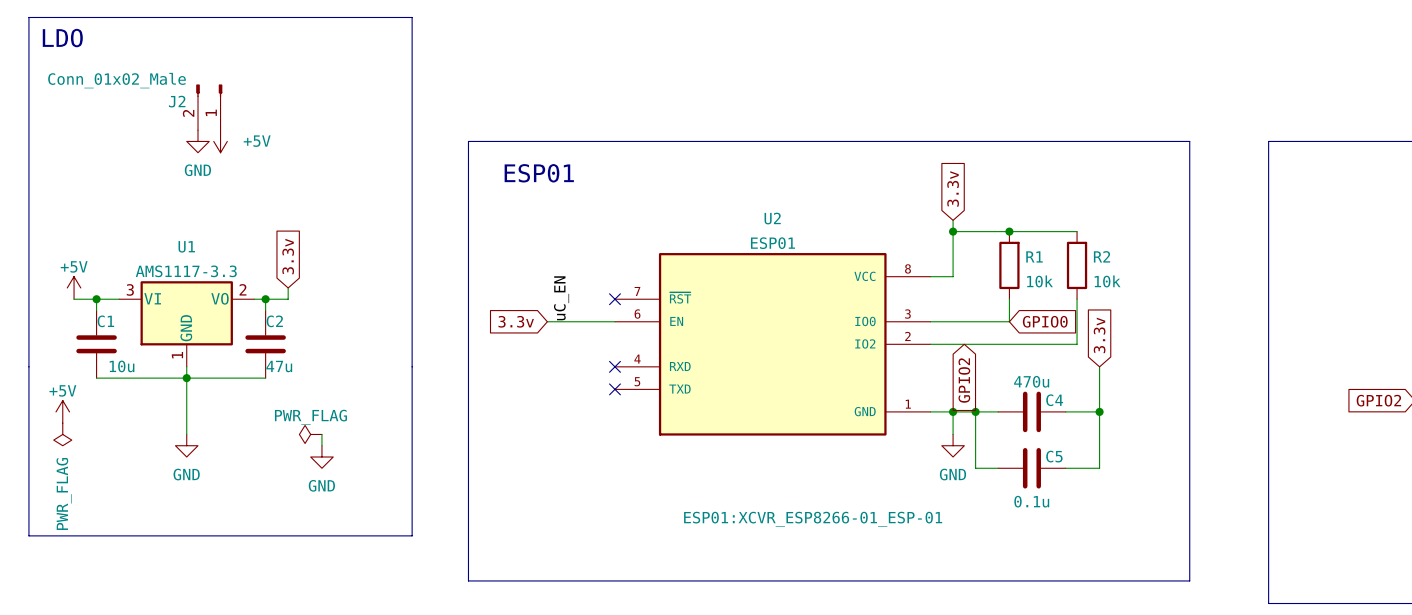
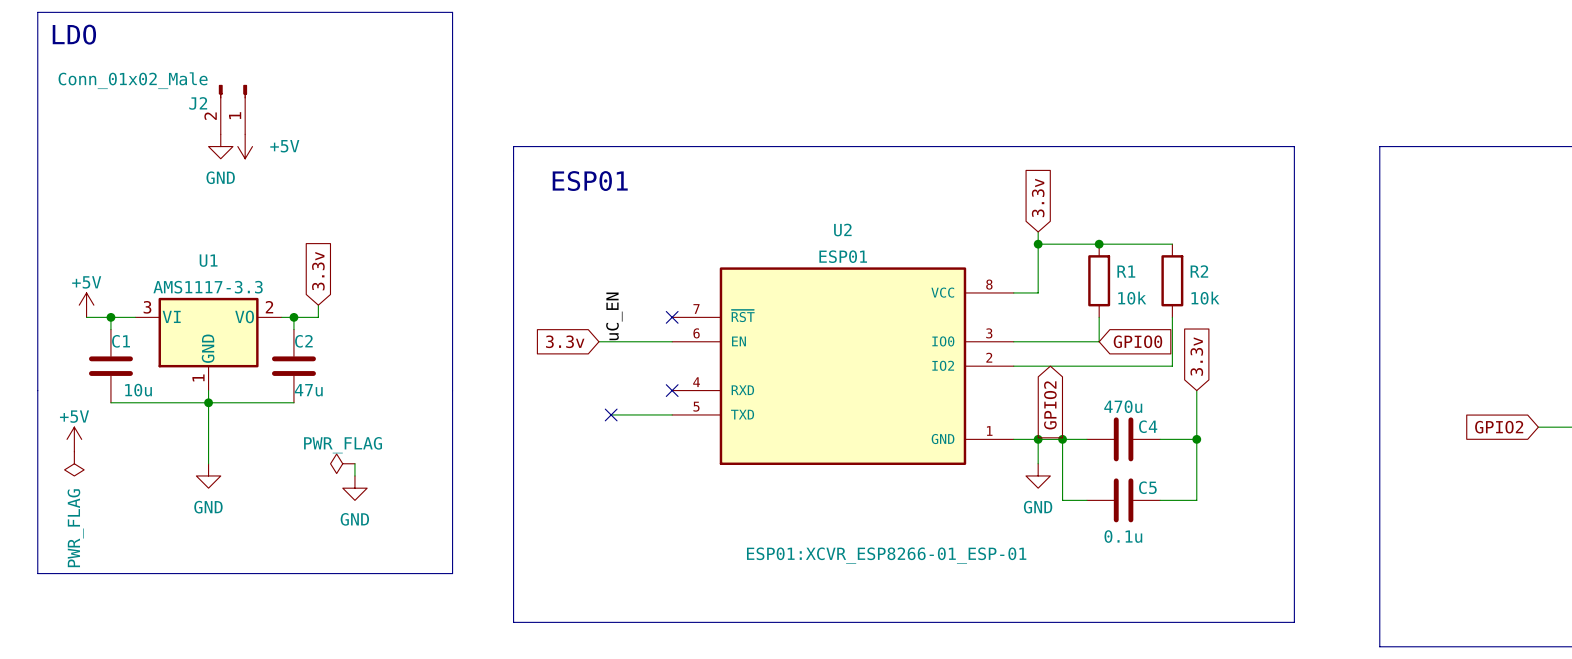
wire: none -> (611, 414) (672, 414)
no-connect mark: none -> (611, 414)
no-connect mark: (614, 389) -> none

